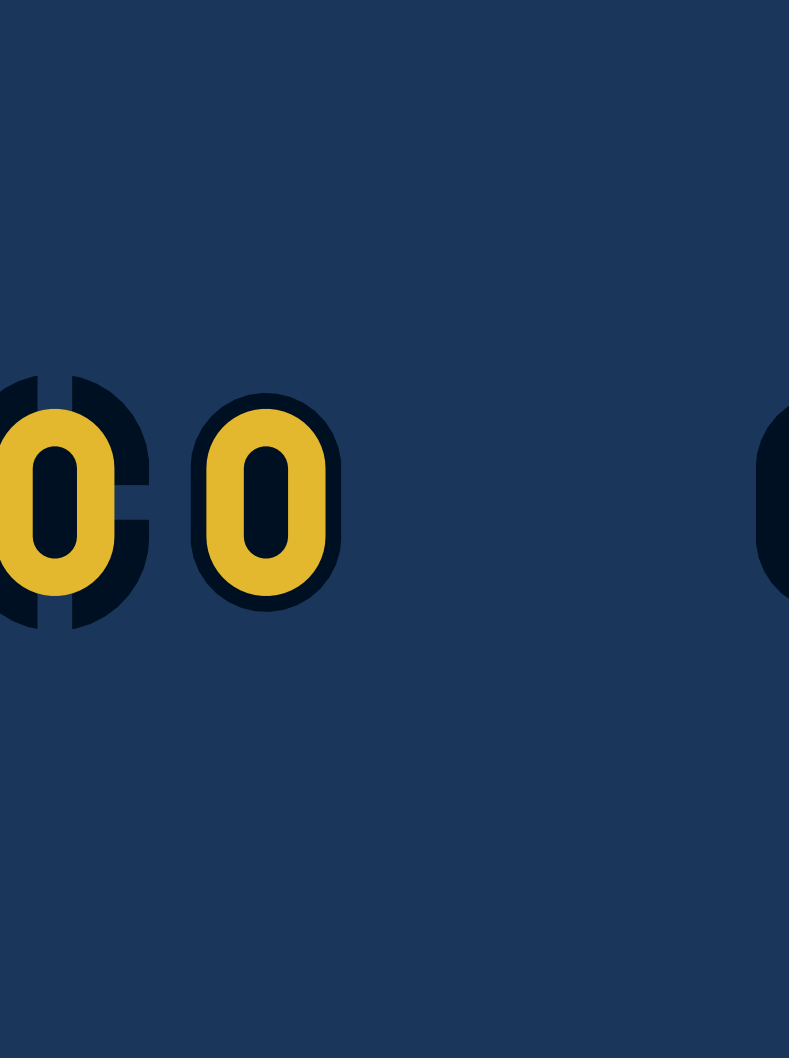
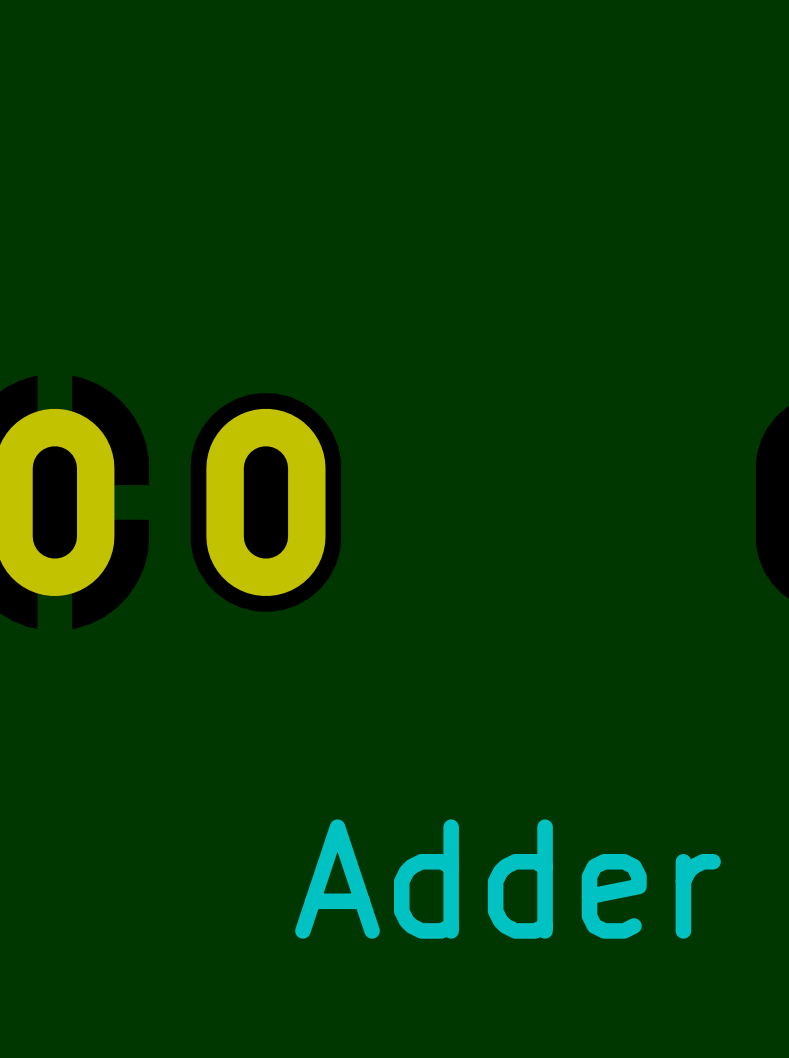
text: none -> Adder (508, 879)

